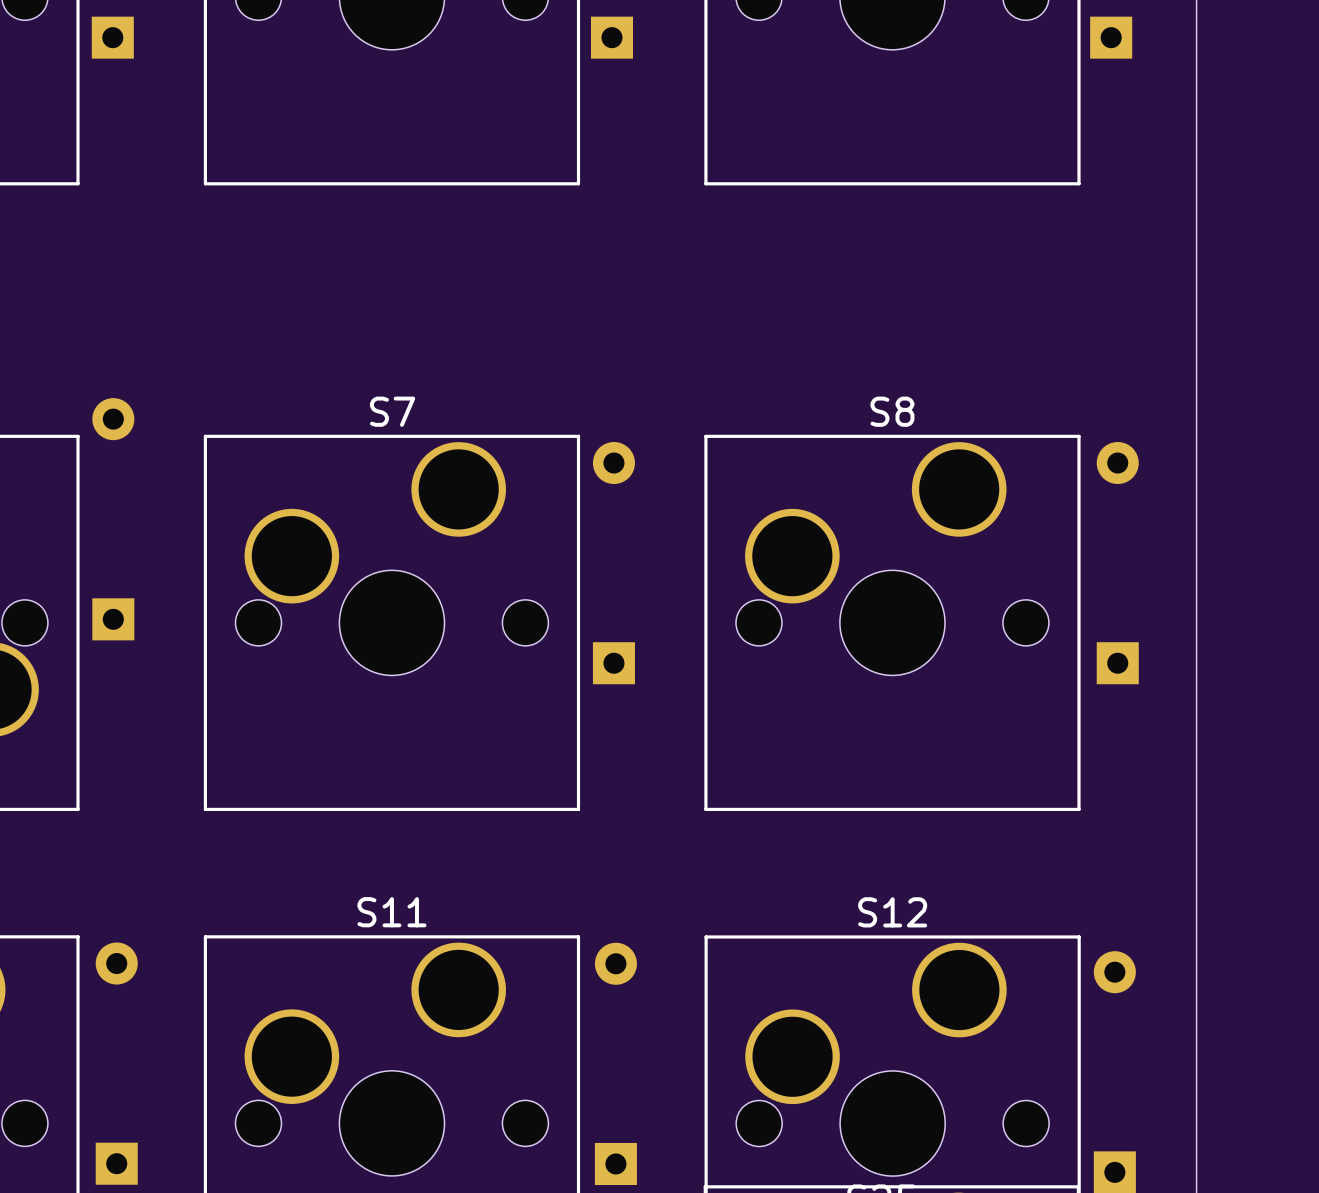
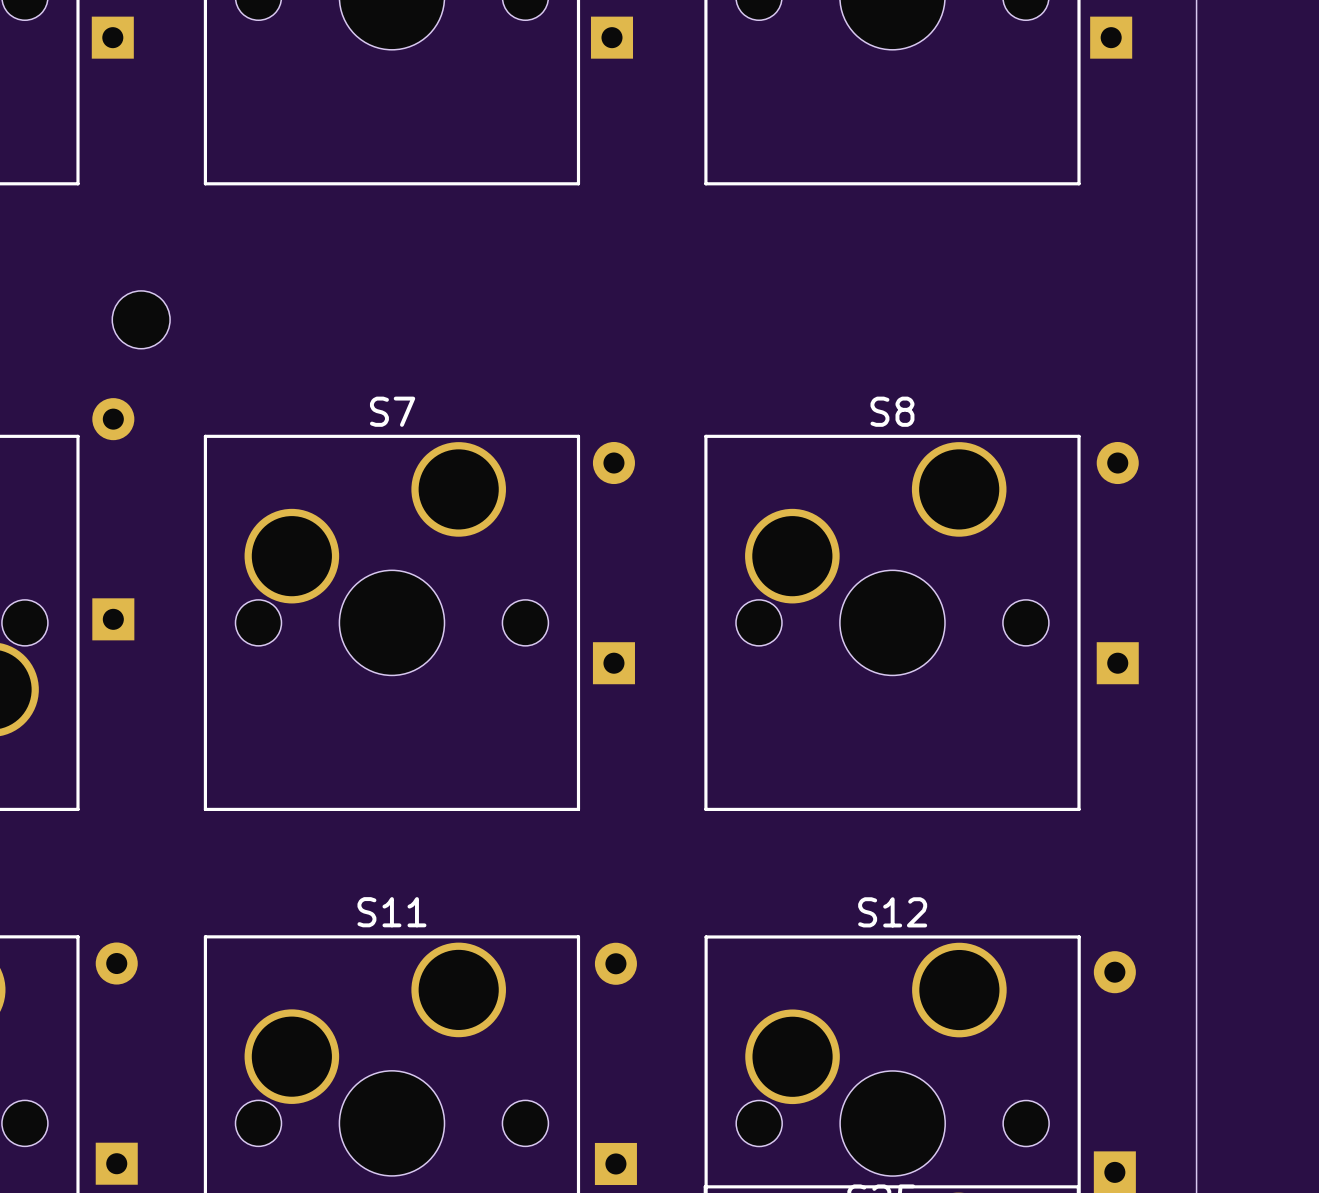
part: none -> (141, 319)

